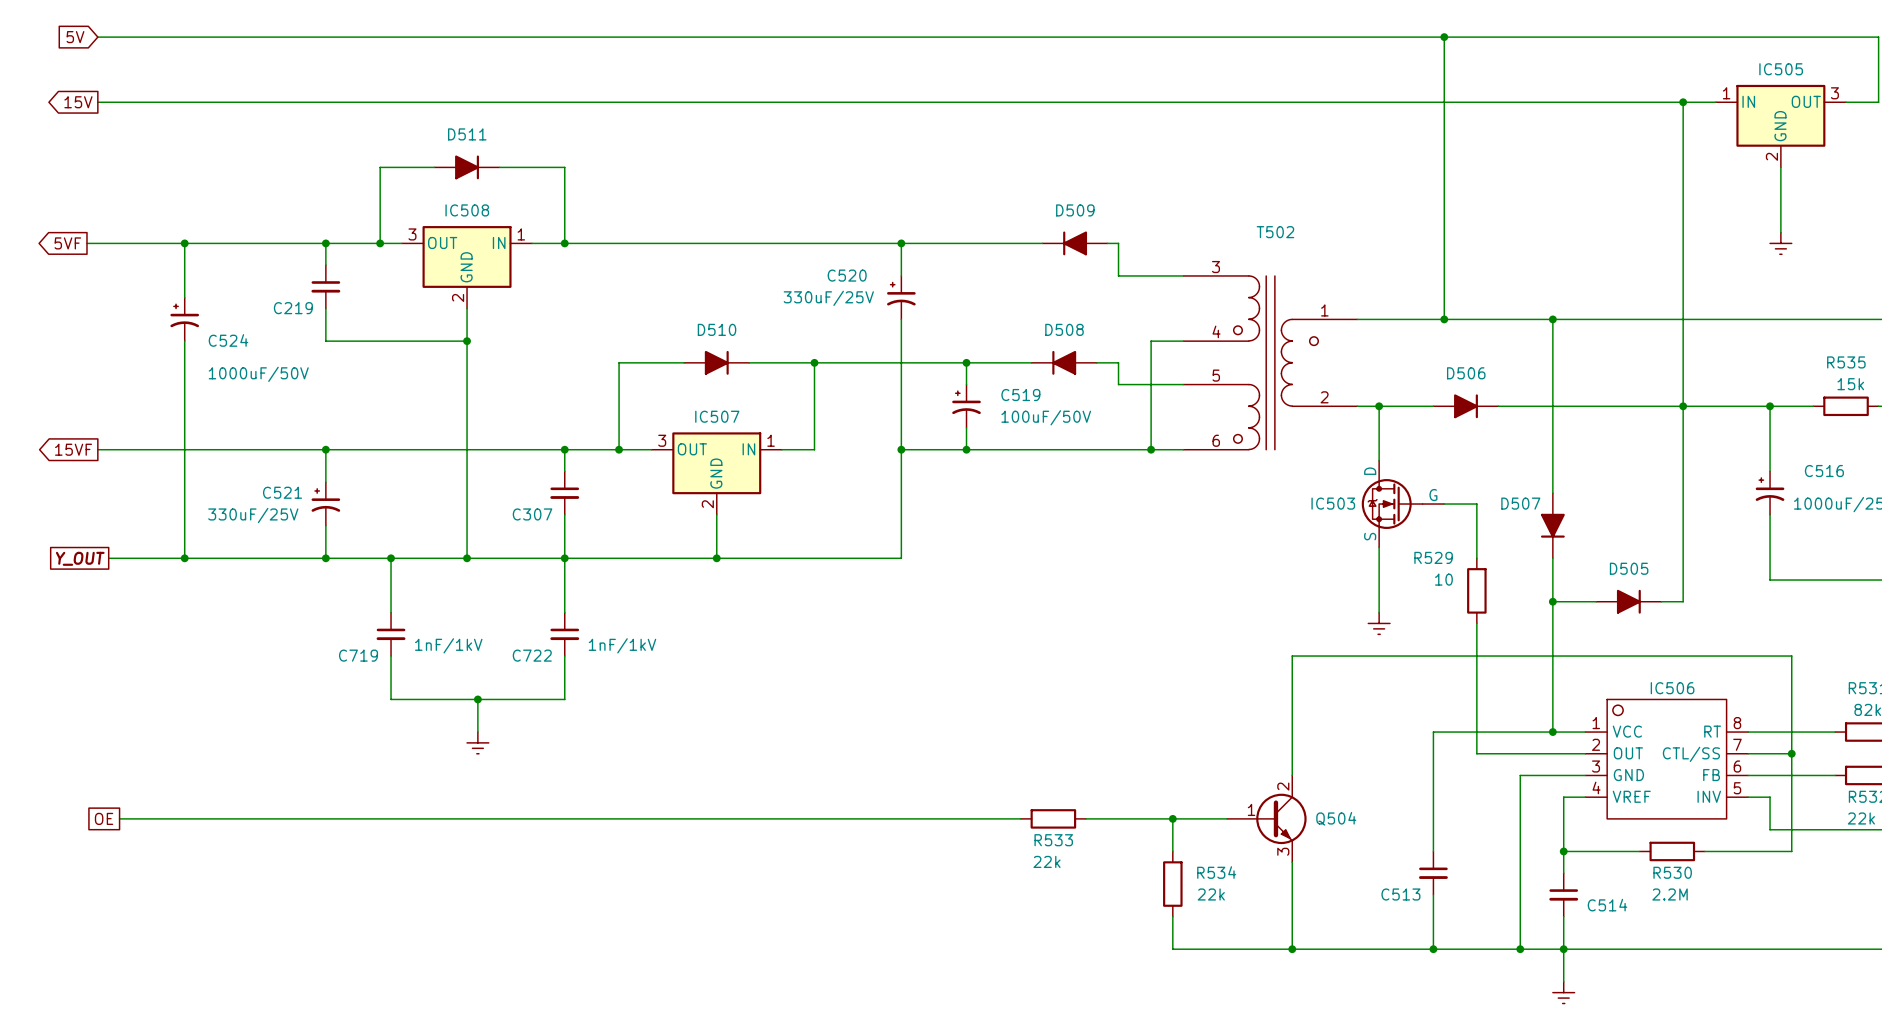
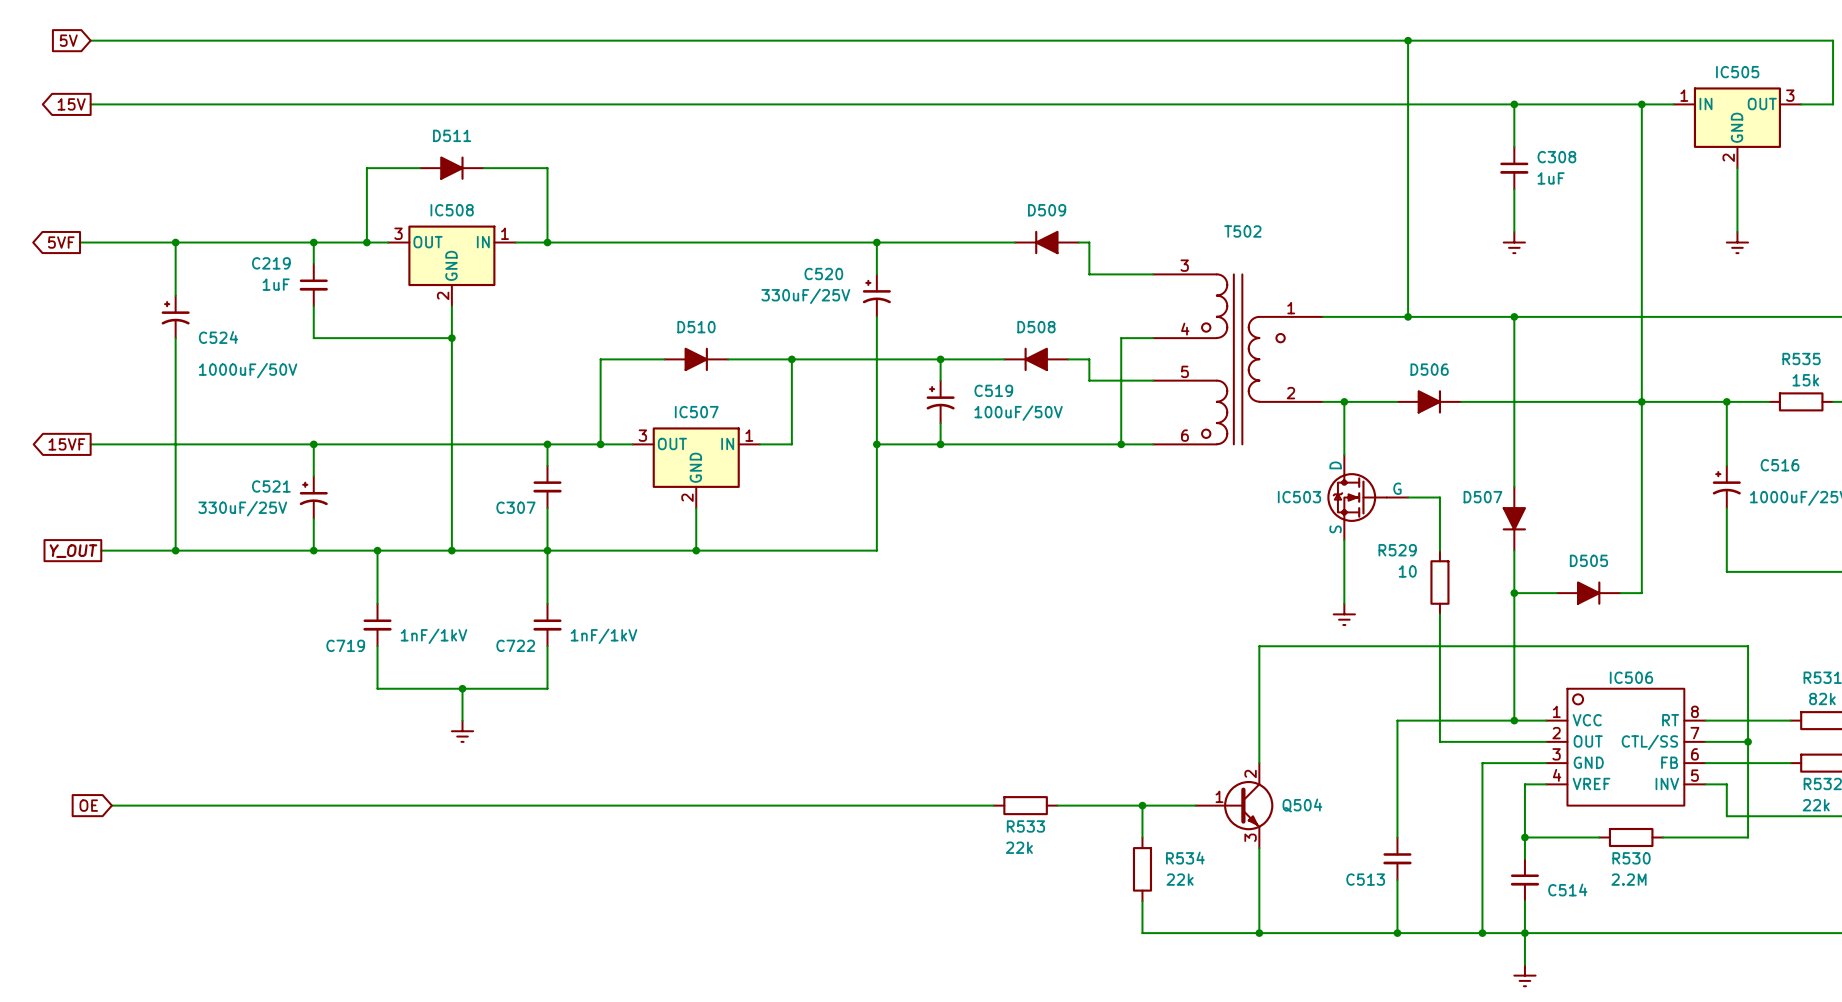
wire: none -> (1514, 104) (1514, 146)
junction: none -> (1514, 104)
C308: none -> 1uF (1514, 168)
wire: none -> (1514, 189) (1514, 231)
power symbol: none -> (1514, 242)
C219 value: none -> 1uF (276, 284)
C219 name position: C219 (293, 308) -> C219 (271, 263)
global label shape: passive (104, 818) -> input (88, 805)

